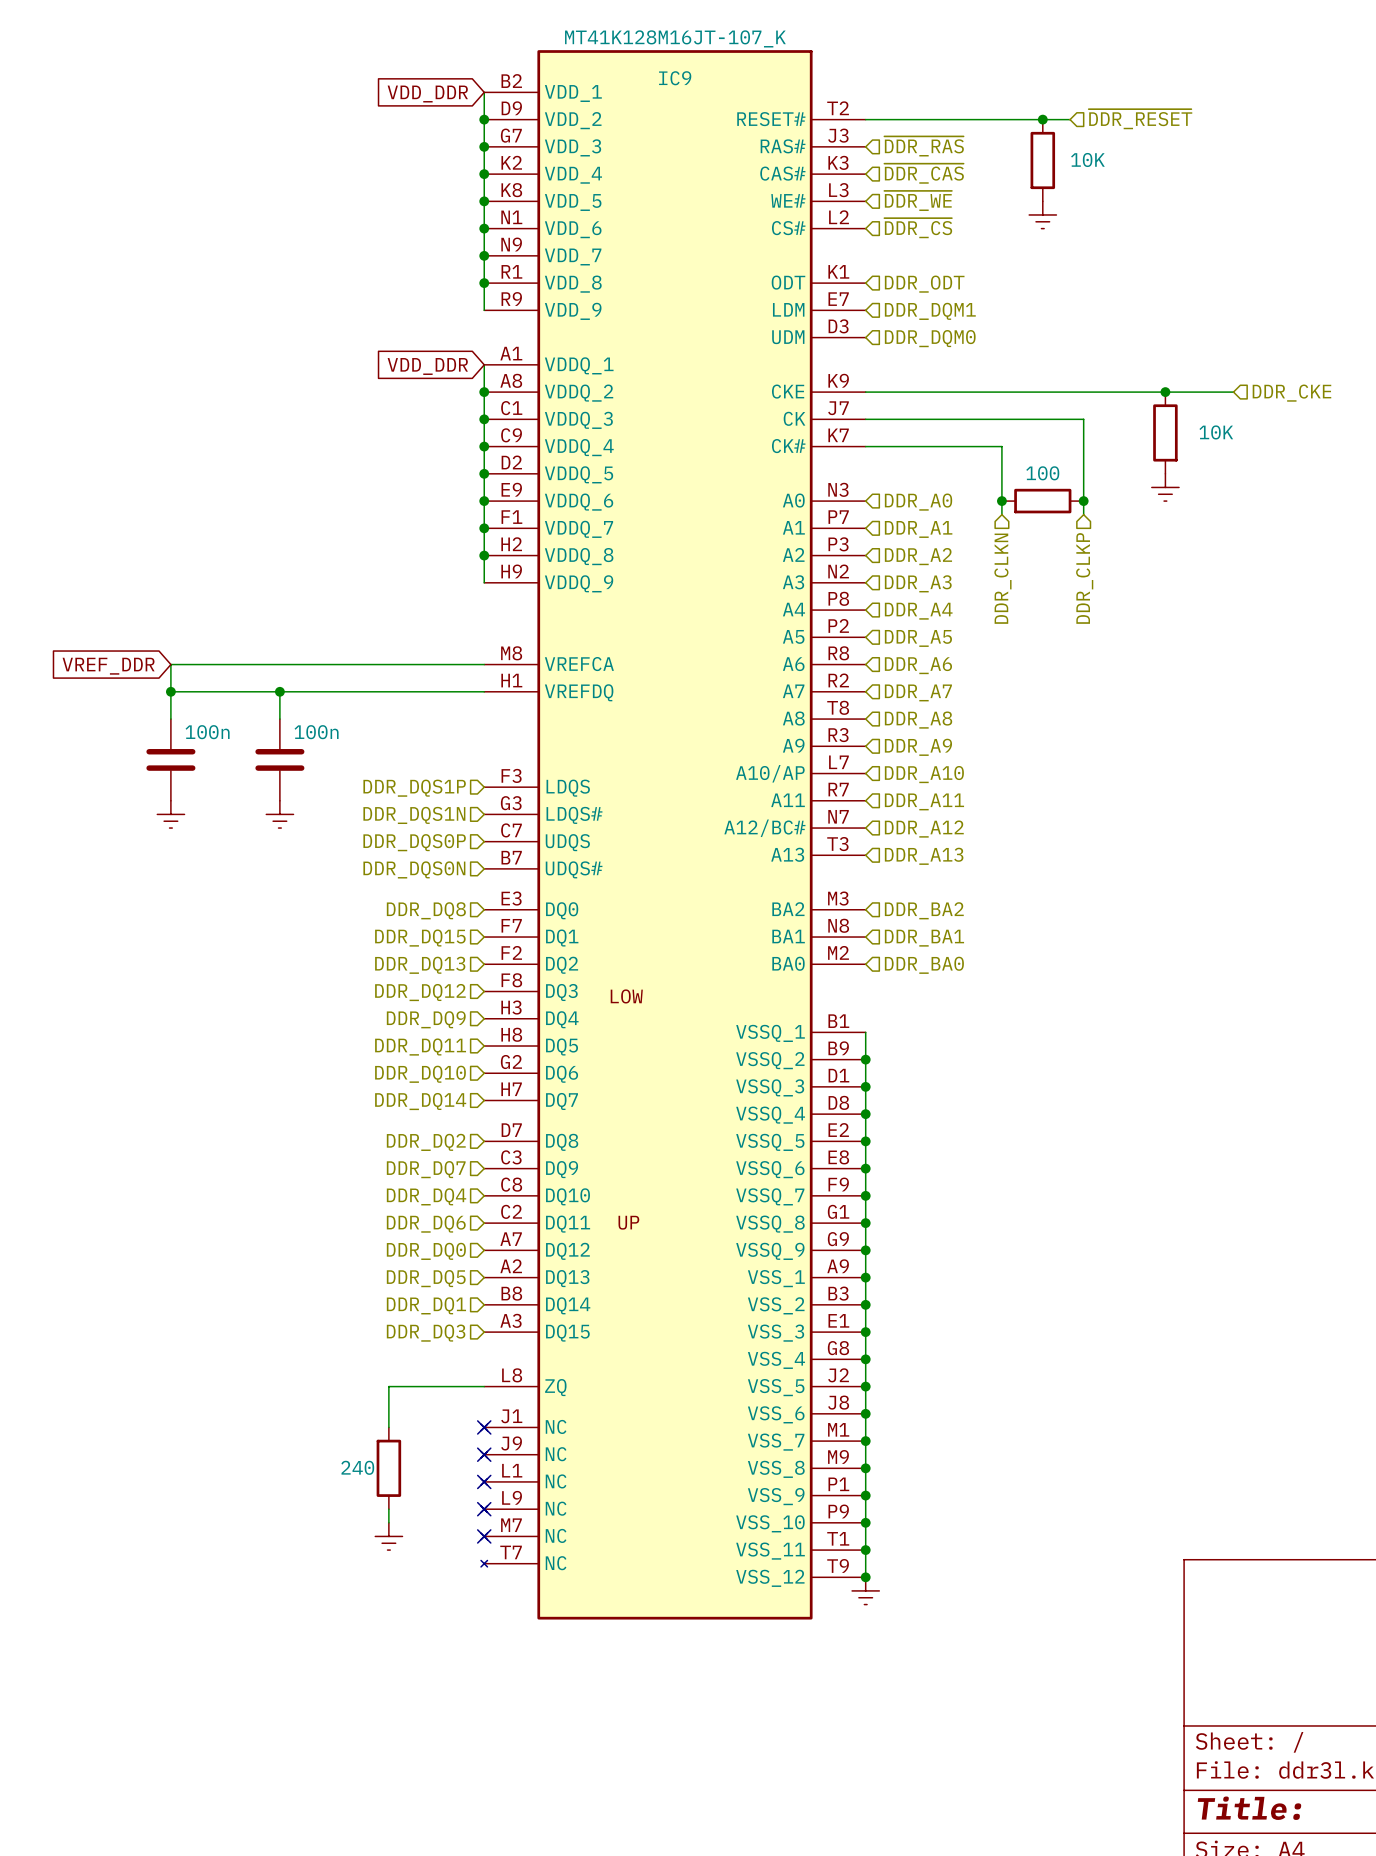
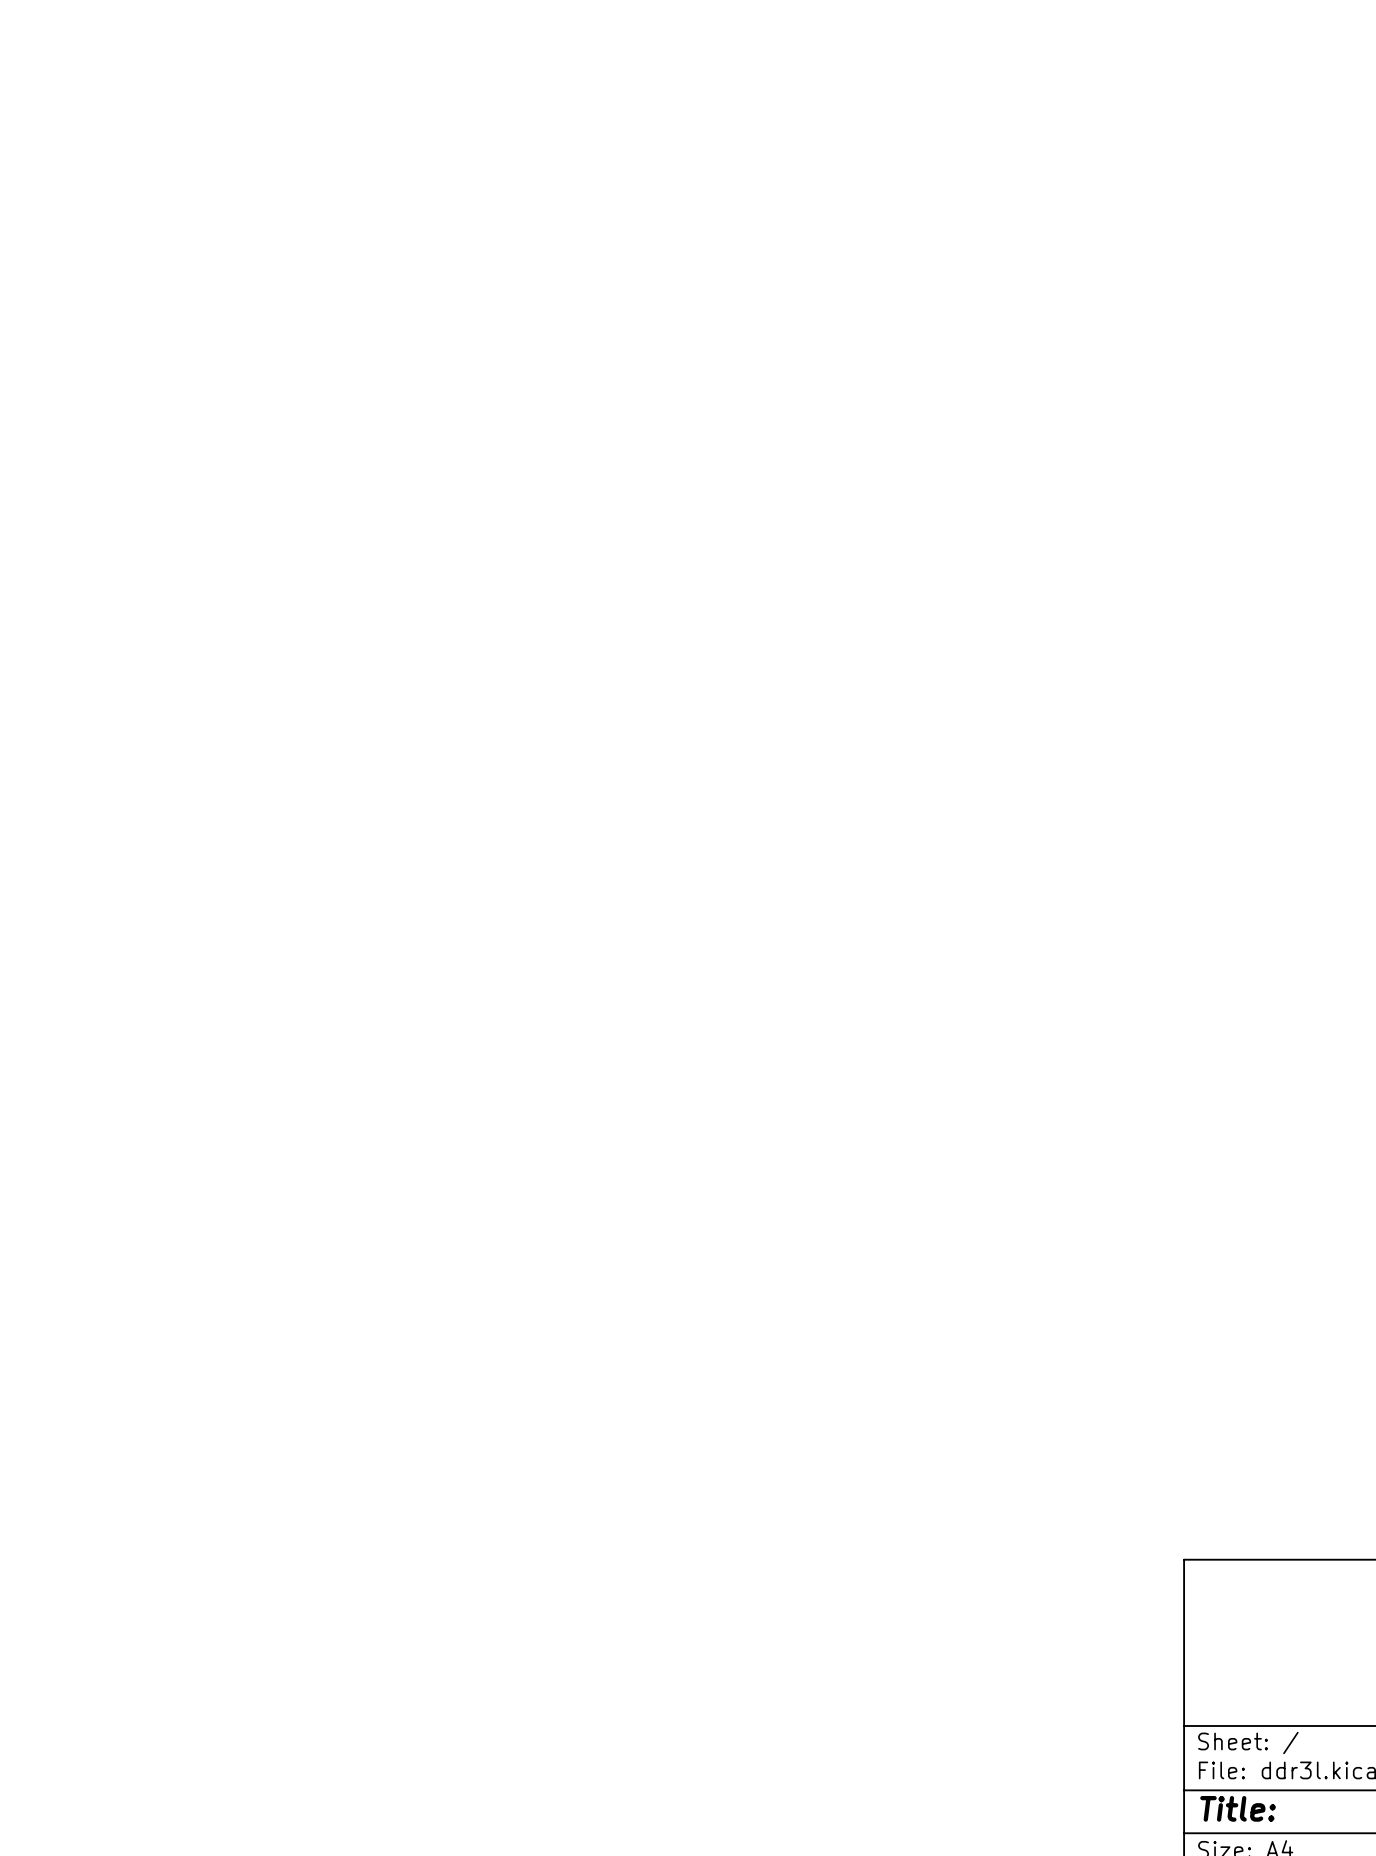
wire: (484, 92) (484, 310) -> none
global label: VDD_DDR (427, 94) -> none
junction: (484, 119) -> none
wire: (865, 119) (1070, 119) -> none
junction: (1042, 119) -> none
hierarchical label: ~{DDR_RESET} (1140, 119) -> none
junction: (484, 146) -> none
hierarchical label: ~{DDR_RAS} (924, 146) -> none
part: 10K (1042, 160) -> none
hierarchical label: ~{DDR_CAS} (924, 173) -> none
junction: (484, 174) -> none
hierarchical label: ~{DDR_WE} (918, 200) -> none
junction: (484, 201) -> none
power symbol: (1042, 214) -> none
junction: (484, 228) -> none
hierarchical label: ~{DDR_CS} (918, 228) -> none
junction: (484, 255) -> none
junction: (484, 283) -> none
hierarchical label: DDR_ODT (924, 284) -> none
hierarchical label: DDR_DQM1 (930, 311) -> none
hierarchical label: DDR_DQM0 (930, 338) -> none
wire: (484, 364) (484, 582) -> none
global label: VDD_DDR (427, 366) -> none
junction: (484, 392) -> none
wire: (865, 392) (1233, 392) -> none
junction: (1165, 392) -> none
hierarchical label: DDR_CKE (1291, 393) -> none
junction: (484, 419) -> none
wire: (865, 419) (1083, 419) (1083, 514) -> none
part: 10K (1165, 432) -> none
junction: (484, 446) -> none
wire: (865, 446) (1001, 446) (1001, 514) -> none
junction: (484, 473) -> none
power symbol: (1165, 487) -> none
junction: (484, 501) -> none
junction: (1001, 501) -> none
part: 100 (1042, 501) -> none
junction: (1083, 501) -> none
hierarchical label: DDR_A0 (918, 502) -> none
junction: (484, 528) -> none
hierarchical label: DDR_A1 (918, 529) -> none
junction: (484, 555) -> none
hierarchical label: DDR_A2 (918, 556) -> none
hierarchical label: DDR_CLKN (1002, 578) -> none
hierarchical label: DDR_CLKP (1084, 578) -> none
hierarchical label: DDR_A3 (918, 583) -> none
hierarchical label: DDR_A4 (918, 611) -> none
hierarchical label: DDR_A5 (918, 638) -> none
wire: (484, 664) (170, 664) (170, 719) -> none
hierarchical label: DDR_A6 (918, 665) -> none
global label: VREF_DDR (108, 666) -> none
wire: (170, 691) (484, 691) -> none
junction: (170, 691) -> none
wire: (279, 691) (279, 719) -> none
junction: (279, 691) -> none
hierarchical label: DDR_A7 (918, 692) -> none
hierarchical label: DDR_A8 (918, 720) -> none
hierarchical label: DDR_A9 (918, 747) -> none
part: 100n (170, 759) -> none
part: 100n (279, 759) -> none
hierarchical label: DDR_A10 (924, 774) -> none
hierarchical label: DDR_DQS1P (414, 788) -> none
hierarchical label: DDR_A11 (924, 801) -> none
power symbol: (170, 814) -> none
power symbol: (279, 814) -> none
hierarchical label: DDR_DQS1N (414, 815) -> none
hierarchical label: DDR_A12 (924, 829) -> none
IC9: MT41K128M16JT-107_K (673, 834) -> none
hierarchical label: DDR_DQS0P (414, 842) -> none
hierarchical label: DDR_A13 (924, 856) -> none
hierarchical label: DDR_DQS0N (414, 869) -> none
hierarchical label: DDR_DQ8 (426, 910) -> none
hierarchical label: DDR_BA2 (924, 910) -> none
hierarchical label: DDR_DQ15 (420, 938) -> none
hierarchical label: DDR_BA1 (924, 938) -> none
hierarchical label: DDR_DQ13 (420, 965) -> none
hierarchical label: DDR_BA0 (924, 965) -> none
hierarchical label: DDR_DQ12 (420, 992) -> none
hierarchical label: DDR_DQ9 (426, 1019) -> none
wire: (865, 1032) (865, 1577) -> none
hierarchical label: DDR_DQ11 (420, 1047) -> none
junction: (865, 1059) -> none
hierarchical label: DDR_DQ10 (420, 1074) -> none
junction: (865, 1086) -> none
hierarchical label: DDR_DQ14 (420, 1101) -> none
junction: (865, 1114) -> none
junction: (865, 1141) -> none
hierarchical label: DDR_DQ2 (426, 1142) -> none
junction: (865, 1168) -> none
hierarchical label: DDR_DQ7 (426, 1169) -> none
junction: (865, 1195) -> none
hierarchical label: DDR_DQ4 (426, 1196) -> none
junction: (865, 1223) -> none
hierarchical label: DDR_DQ6 (426, 1224) -> none
junction: (865, 1250) -> none
hierarchical label: DDR_DQ0 (426, 1251) -> none
junction: (865, 1277) -> none
hierarchical label: DDR_DQ5 (426, 1278) -> none
junction: (865, 1304) -> none
hierarchical label: DDR_DQ1 (426, 1305) -> none
junction: (865, 1332) -> none
hierarchical label: DDR_DQ3 (426, 1333) -> none
junction: (865, 1359) -> none
wire: (484, 1386) (388, 1386) (388, 1427) -> none
junction: (865, 1386) -> none
junction: (865, 1413) -> none
no-connect mark: (484, 1427) -> none
junction: (865, 1441) -> none
no-connect mark: (484, 1454) -> none
part: 240 (388, 1468) -> none
junction: (865, 1468) -> none
no-connect mark: (484, 1481) -> none
junction: (865, 1495) -> none
wire: (388, 1509) (388, 1522) -> none
no-connect mark: (484, 1509) -> none
junction: (865, 1522) -> none
power symbol: (388, 1536) -> none
no-connect mark: (484, 1536) -> none
junction: (865, 1550) -> none
junction: (865, 1577) -> none
power symbol: (865, 1590) -> none

